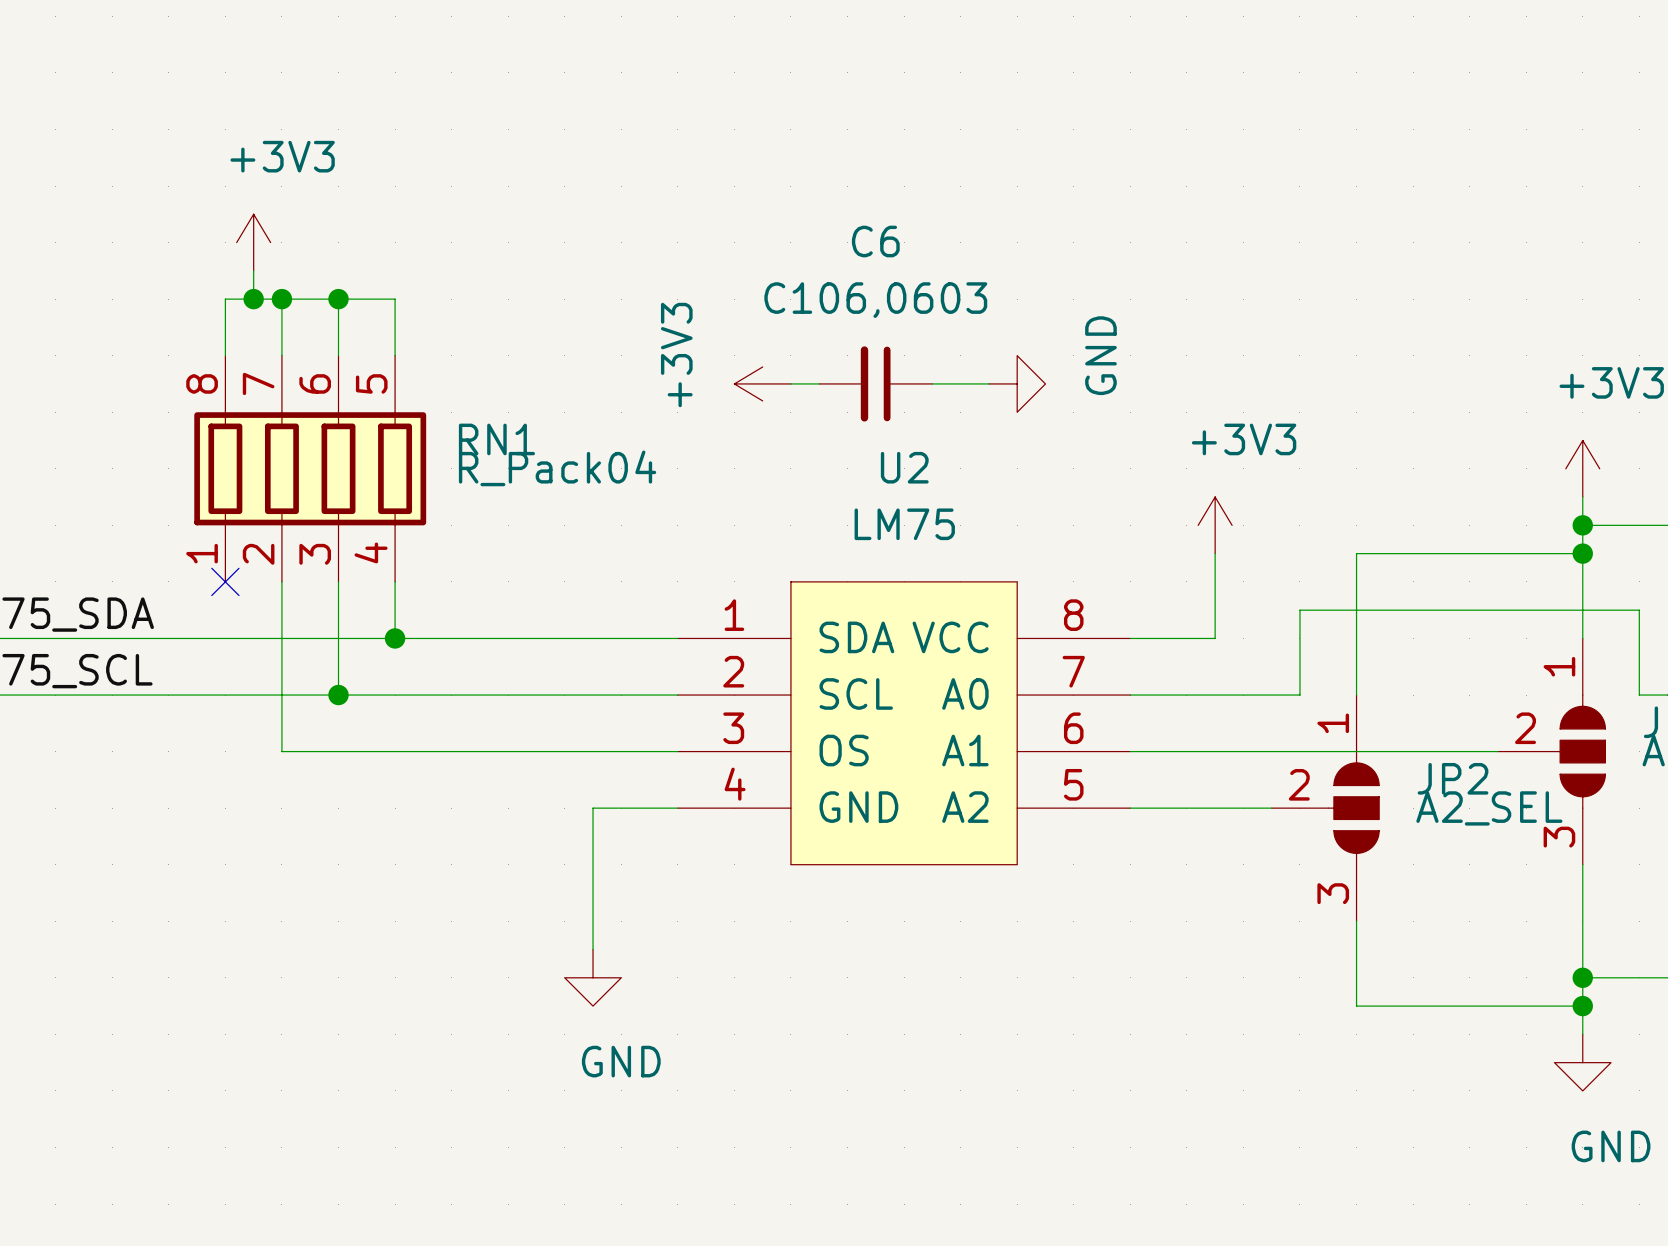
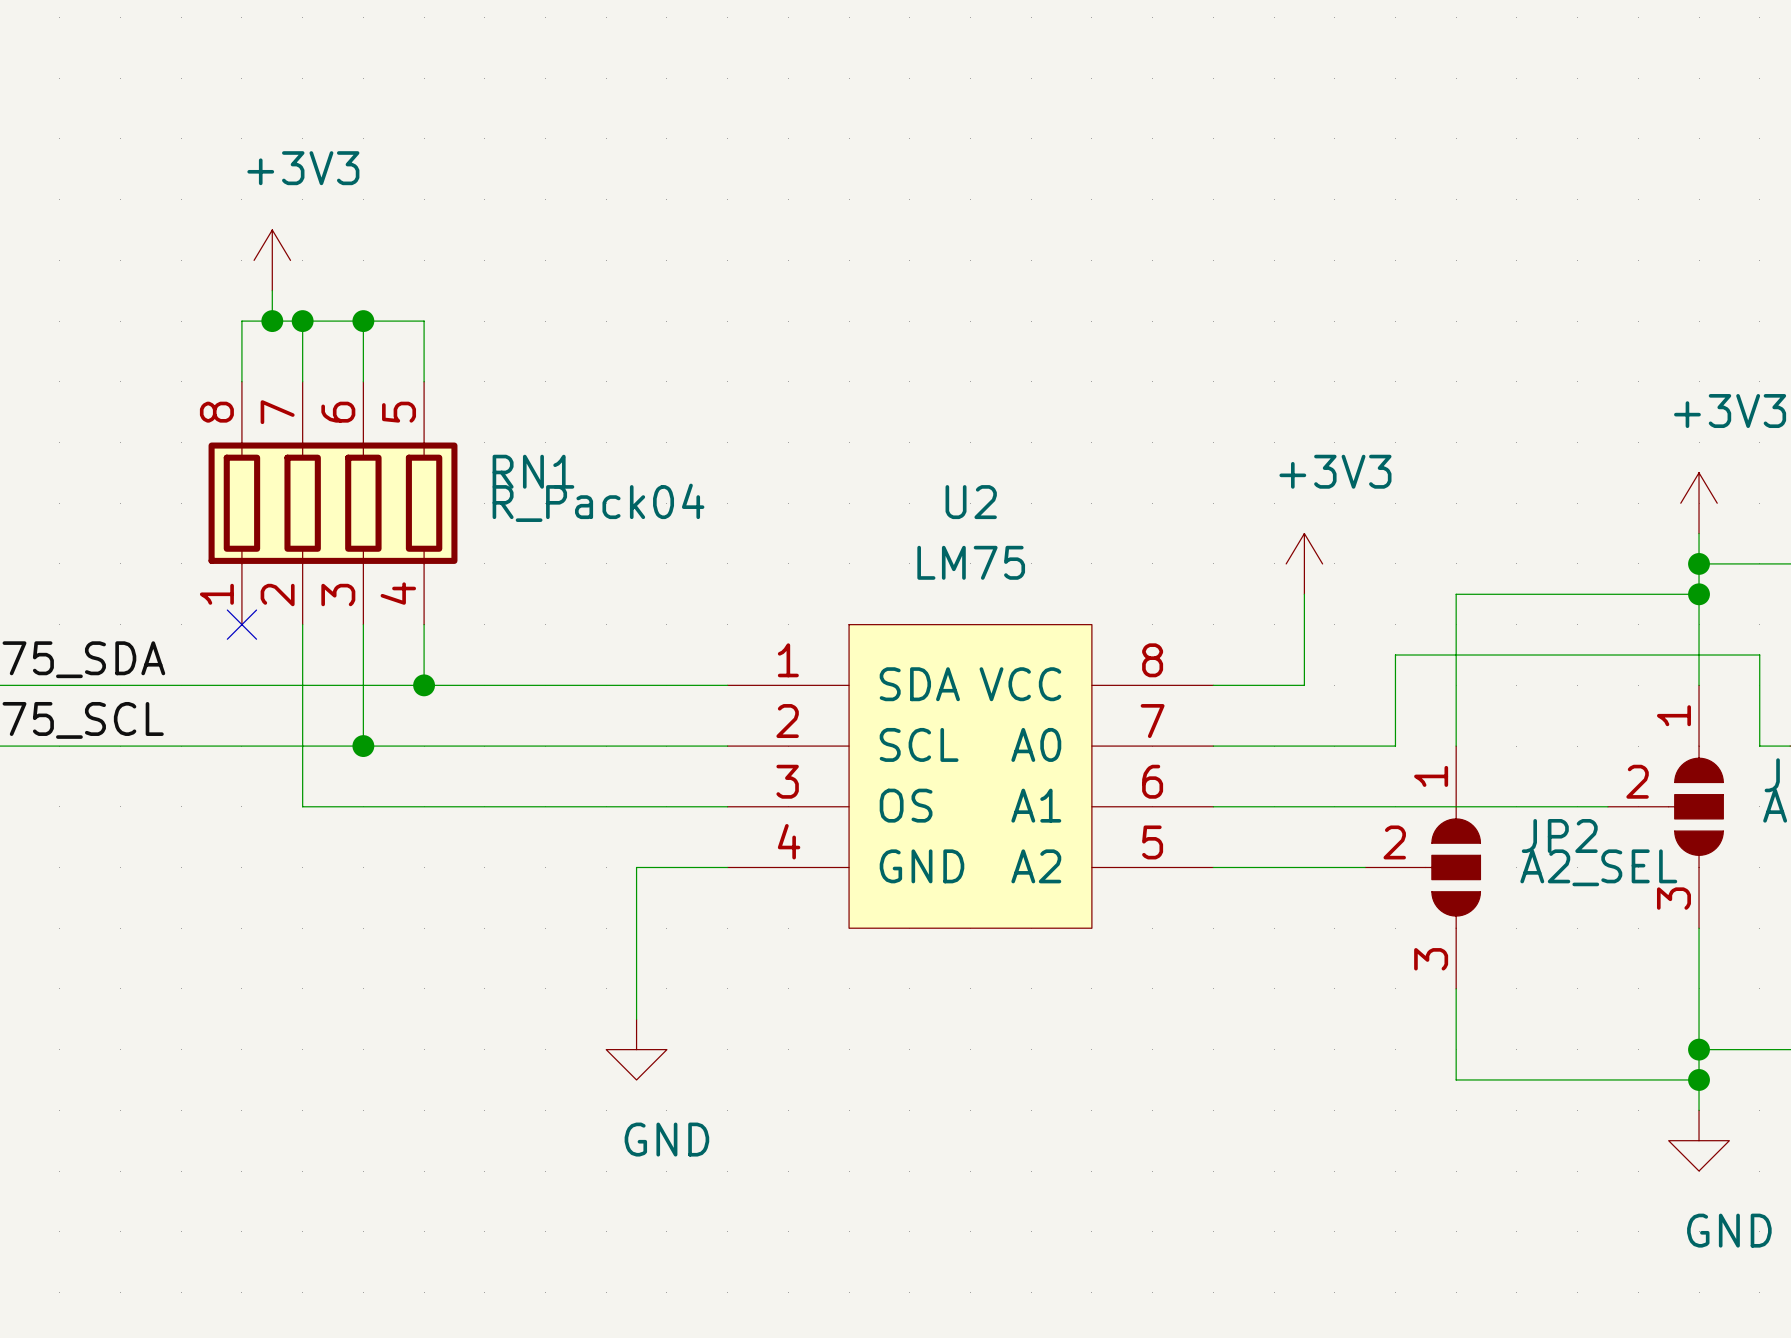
power symbol: +3V3 (762, 383) -> none
wire: (790, 383) (819, 383) -> none
C6: C106,0603 (875, 383) -> none
wire: (932, 383) (988, 383) -> none
power symbol: GND (1017, 383) -> none

